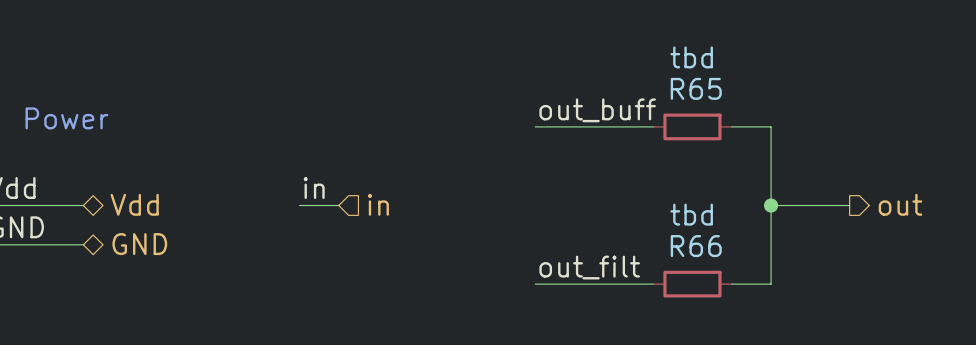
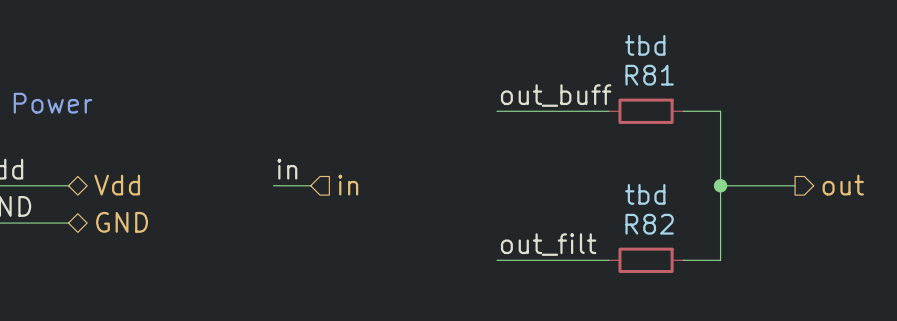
R65 name: R65 (696, 88) -> R81 (649, 75)
R66 name: R66 (696, 246) -> R82 (649, 224)

